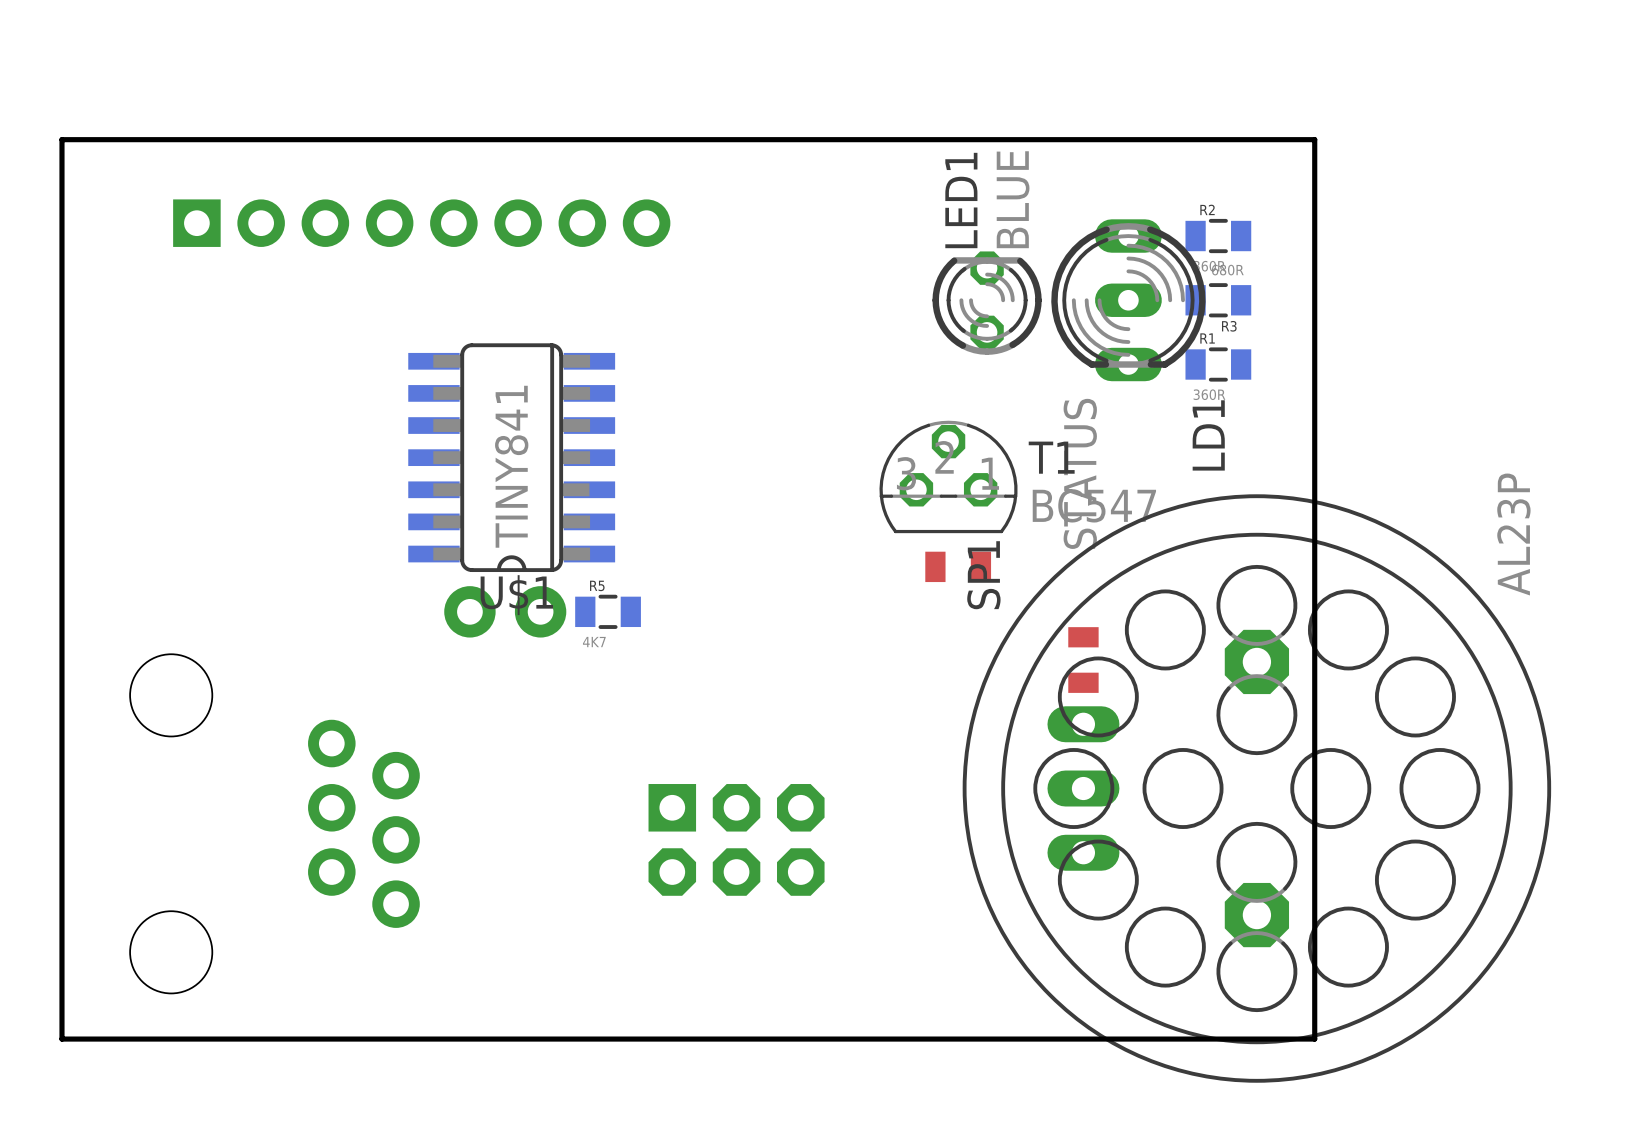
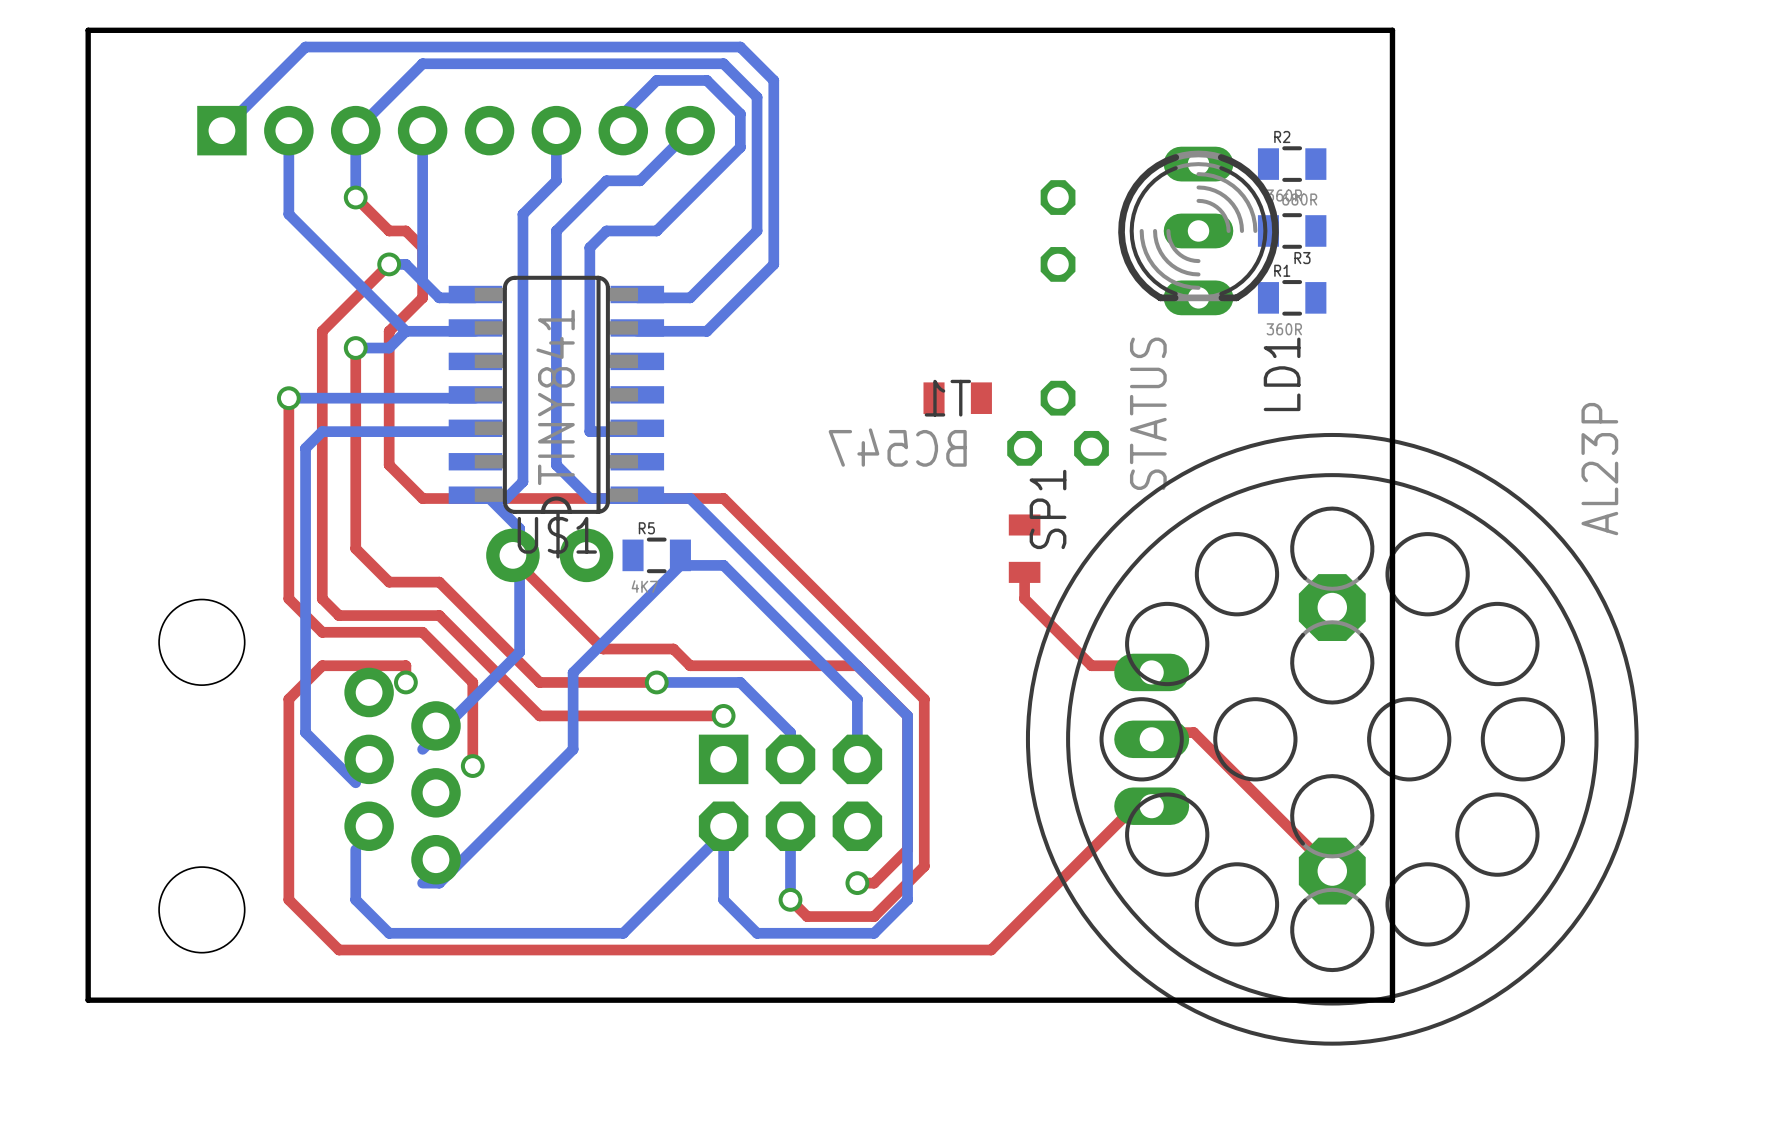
board edge: (1314, 139) (61, 139) -> (1392, 63) (1392, 30) (88, 30) (88, 63)
bottom track: none -> (221, 130) (305, 47) (740, 47) (773, 80) (773, 264) (706, 331) (637, 331)
bottom track: none -> (288, 130) (288, 214) (405, 331)
bottom track: none -> (422, 130) (422, 281)
bottom track: none -> (556, 130) (556, 180) (522, 214) (522, 481) (506, 498) (475, 498)
bottom track: none -> (623, 130) (623, 113) (656, 80) (706, 80) (740, 113) (740, 147) (656, 230) (606, 230) (589, 247) (589, 431) (637, 431)
bottom track: none -> (690, 130) (640, 180) (606, 180) (556, 230) (556, 465) (589, 498) (690, 498) (907, 715) (907, 899) (874, 933) (757, 933) (723, 899) (723, 832) (623, 933) (389, 933) (355, 899) (355, 849)
part position: (421, 223) -> (456, 130)
bottom track: none -> (355, 197) (355, 130) (422, 63) (723, 63) (757, 97) (757, 230) (690, 297) (637, 297)
top track: none -> (355, 197) (389, 230) (405, 230) (422, 247) (422, 297) (389, 331) (389, 465) (422, 498) (723, 498) (924, 699) (924, 866) (874, 916) (807, 916) (790, 899)
via: none -> (355, 197)
LED1 side: bottom (987, 303) -> top (1058, 230)
bottom track: none -> (389, 264) (405, 264) (439, 297) (475, 297)
top track: none -> (389, 264) (322, 331) (322, 598) (339, 615) (439, 615) (539, 715) (723, 715)
via: none -> (389, 264)
bottom track: none -> (405, 331) (389, 348) (355, 348)
bottom track: none -> (475, 331) (405, 331)
top track: none -> (355, 348) (355, 548) (389, 582) (439, 582) (539, 682) (656, 682)
via: none -> (355, 348)
top track: none -> (288, 398) (288, 598) (322, 632) (422, 632) (472, 682) (472, 766)
via: none -> (288, 398)
bottom track: none -> (475, 398) (288, 398)
part: none -> (957, 398)
T1 side: bottom (948, 476) -> top (1058, 423)
bottom track: none -> (475, 431) (322, 431) (305, 448) (305, 732) (355, 782)
bottom track: none -> (489, 498) (519, 528) (519, 652) (422, 749)
part rotation: 0° (958, 566) -> 90° clockwise (1024, 548)
top track: none -> (519, 565) (603, 649) (673, 649) (690, 665) (857, 665) (907, 715) (907, 849) (874, 883) (857, 883)
top track: none -> (1024, 572) (1024, 598) (1091, 665) (1141, 665)
part: (1083, 660) -> none
top track: none -> (405, 682) (405, 665) (322, 665) (288, 699) (288, 899) (339, 950) (991, 950) (1141, 799)
via: none -> (405, 682)
bottom track: none -> (656, 682) (740, 682) (790, 732) (790, 766)
via: none -> (656, 682)
via: none -> (723, 715)
top track: none -> (1141, 732) (1193, 732) (1325, 864)
via: none -> (472, 766)
bottom track: none -> (857, 766) (857, 699) (723, 565) (680, 565) (573, 672) (573, 749) (439, 883) (422, 883)
bottom track: none -> (790, 832) (790, 899)
via: none -> (857, 883)
via: none -> (790, 899)

